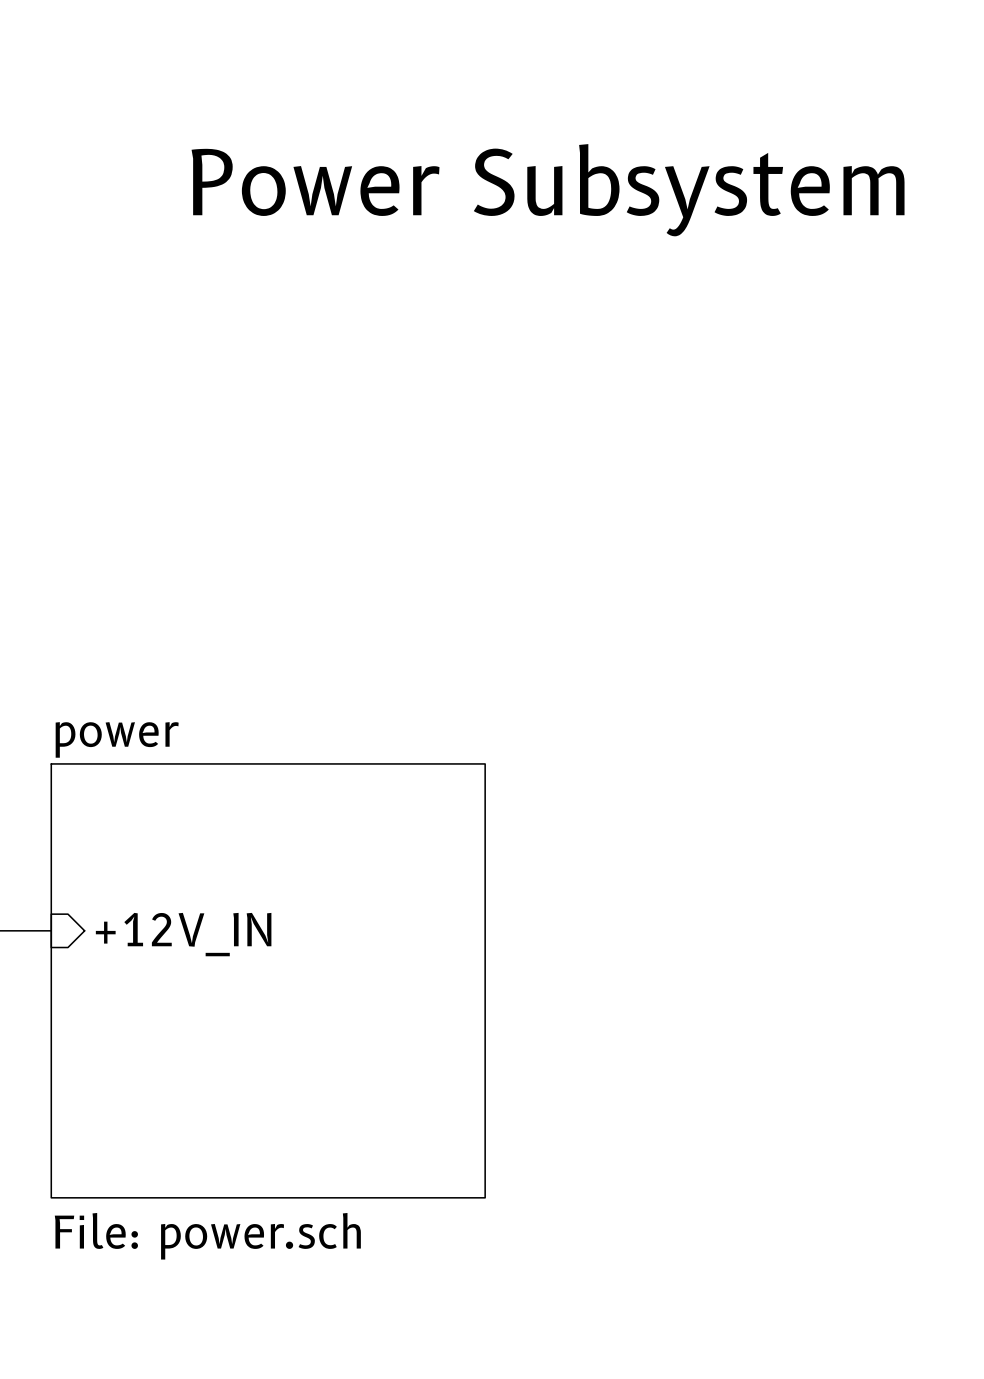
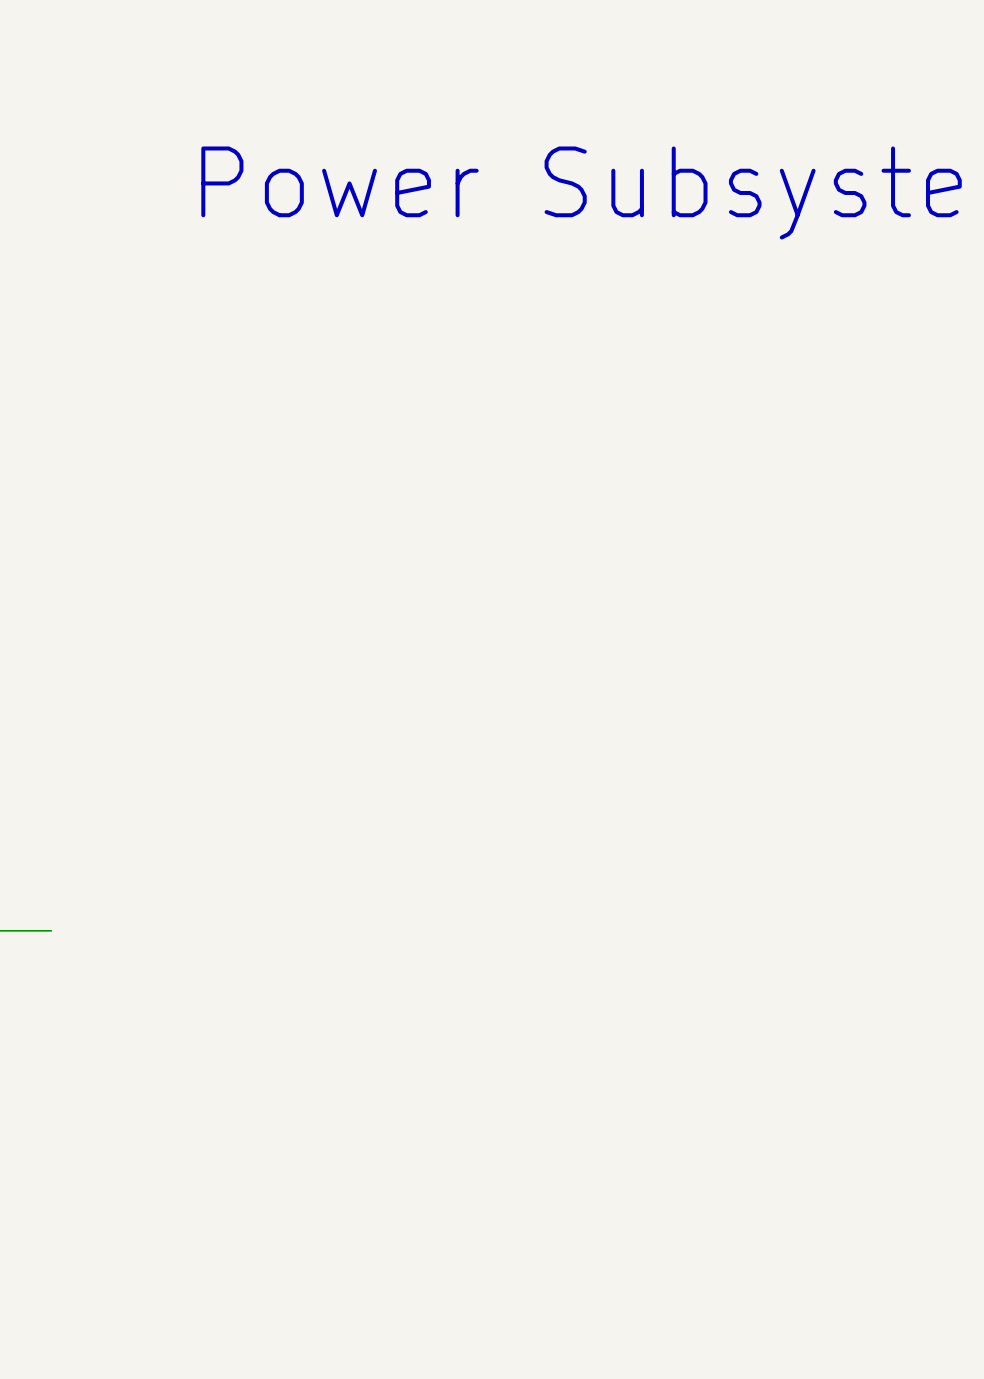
sheet pin: +12V_IN (183, 934) -> none
sheet power: File: power.sch (268, 980) -> none

